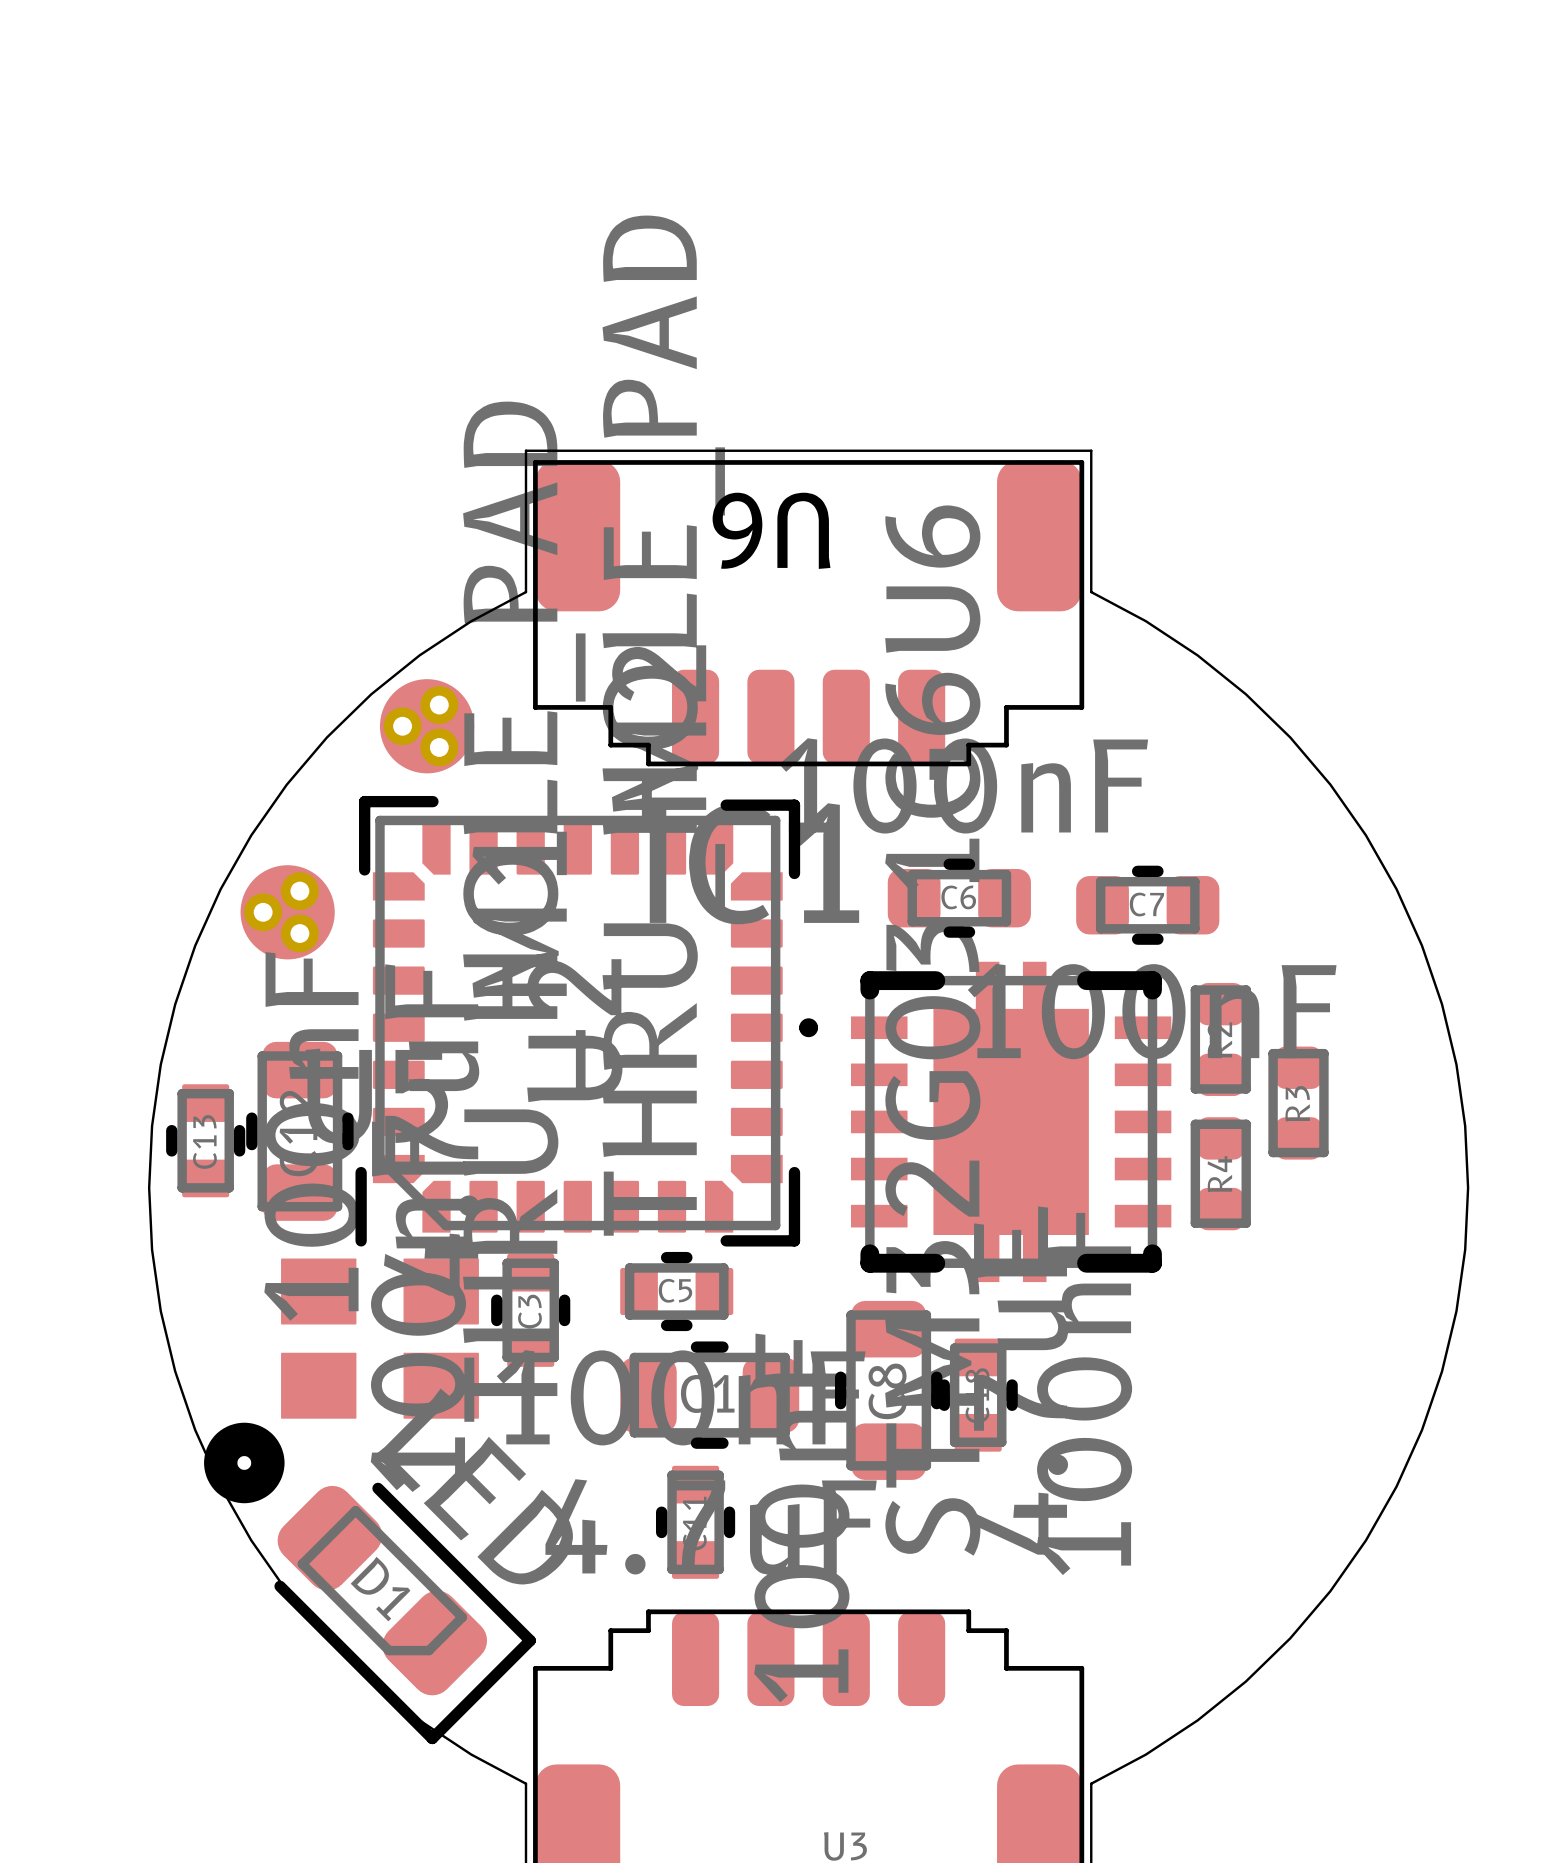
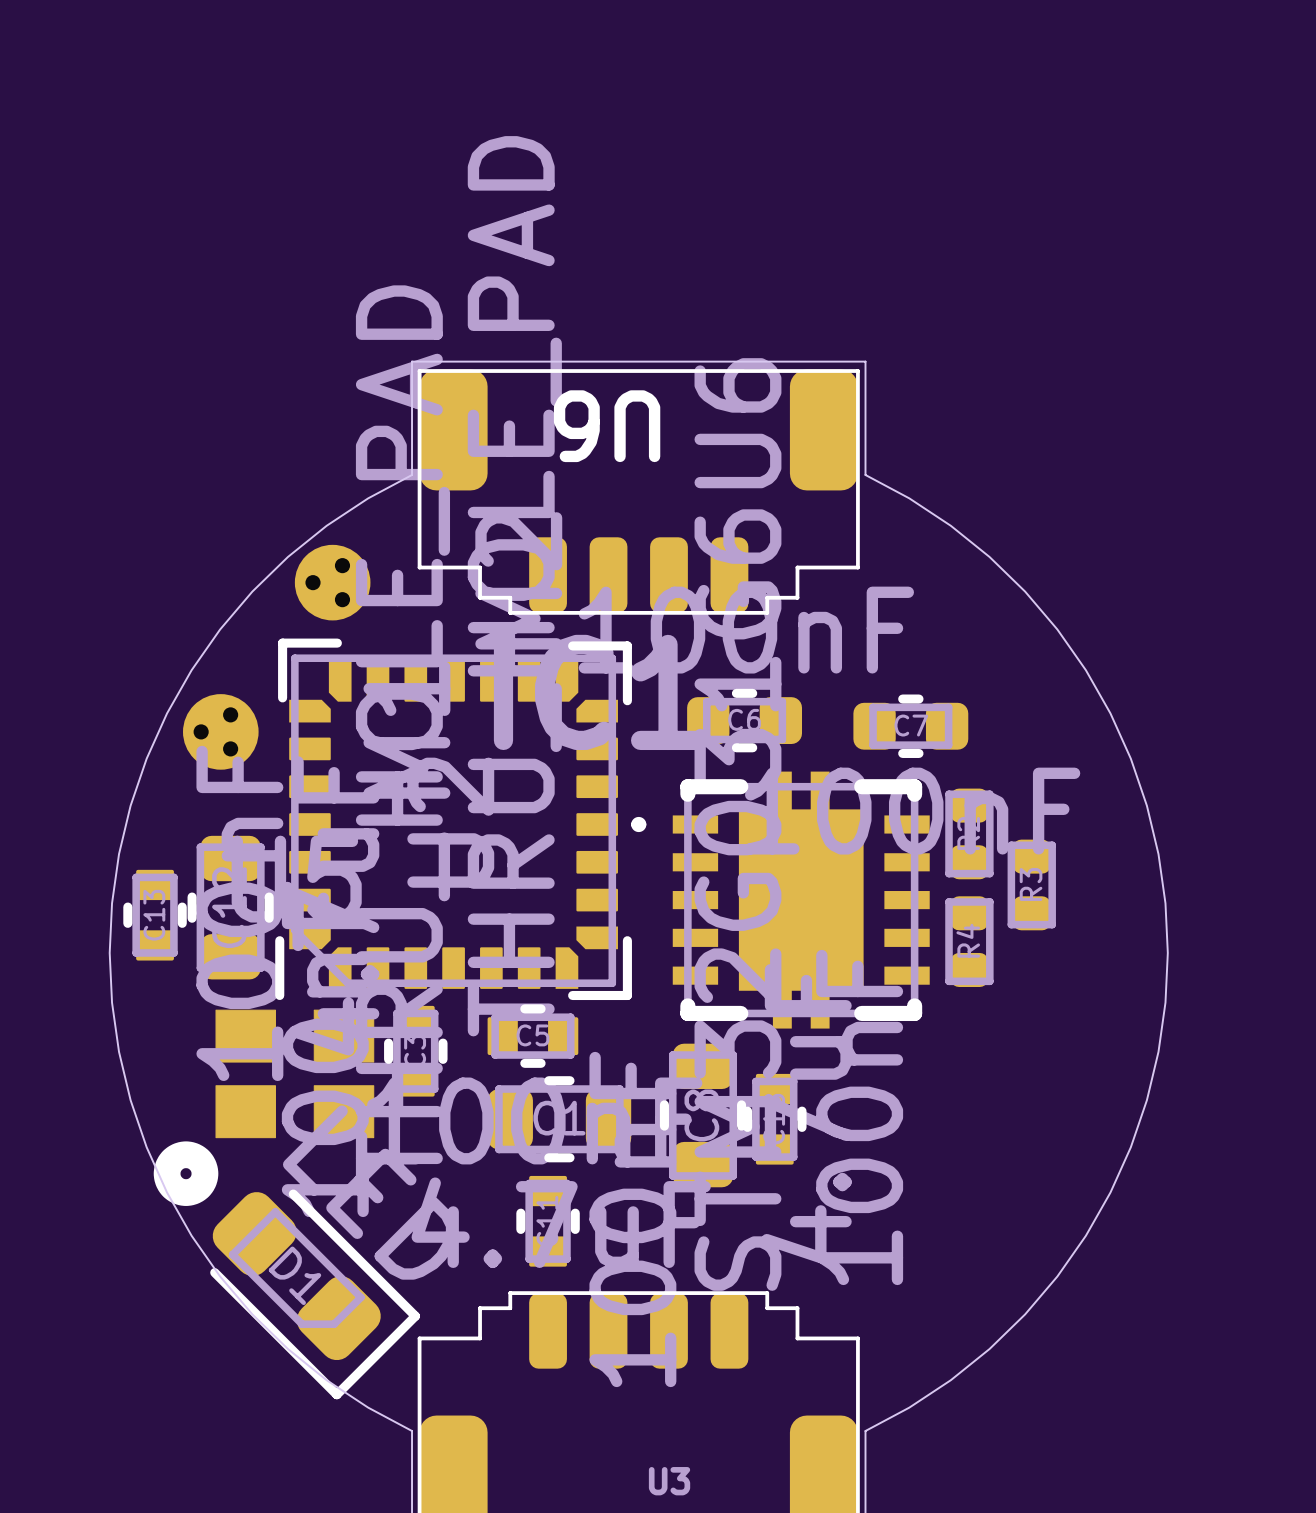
C6 position: (959, 898) -> (744, 720)

